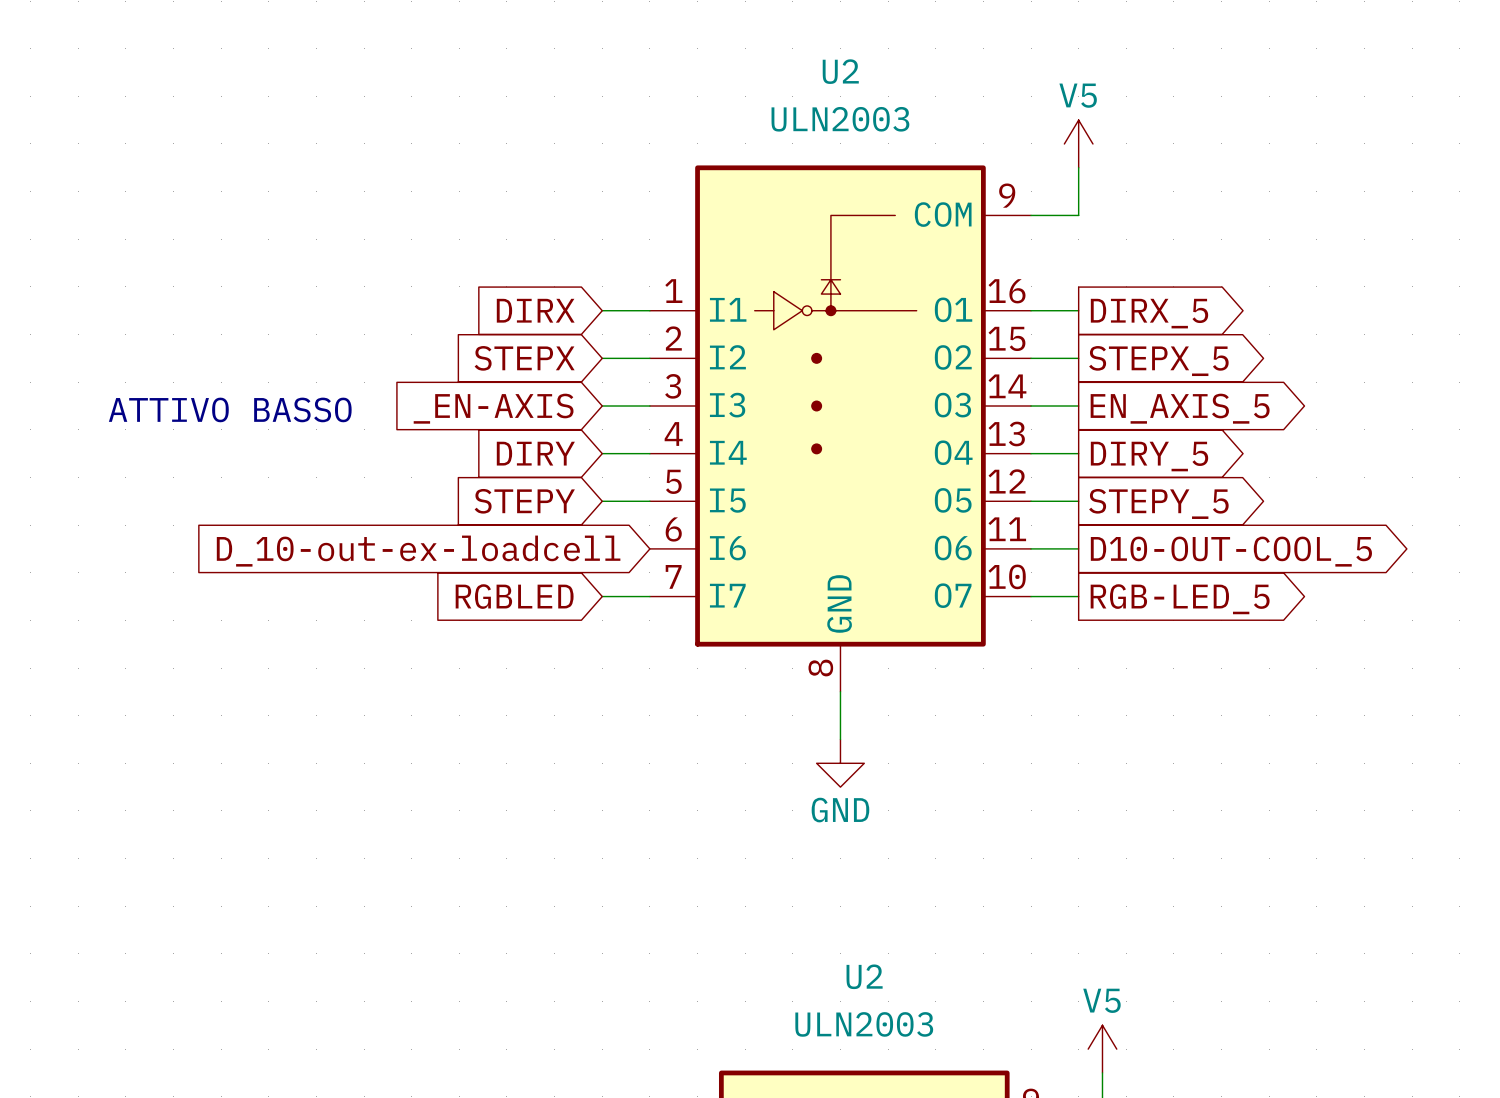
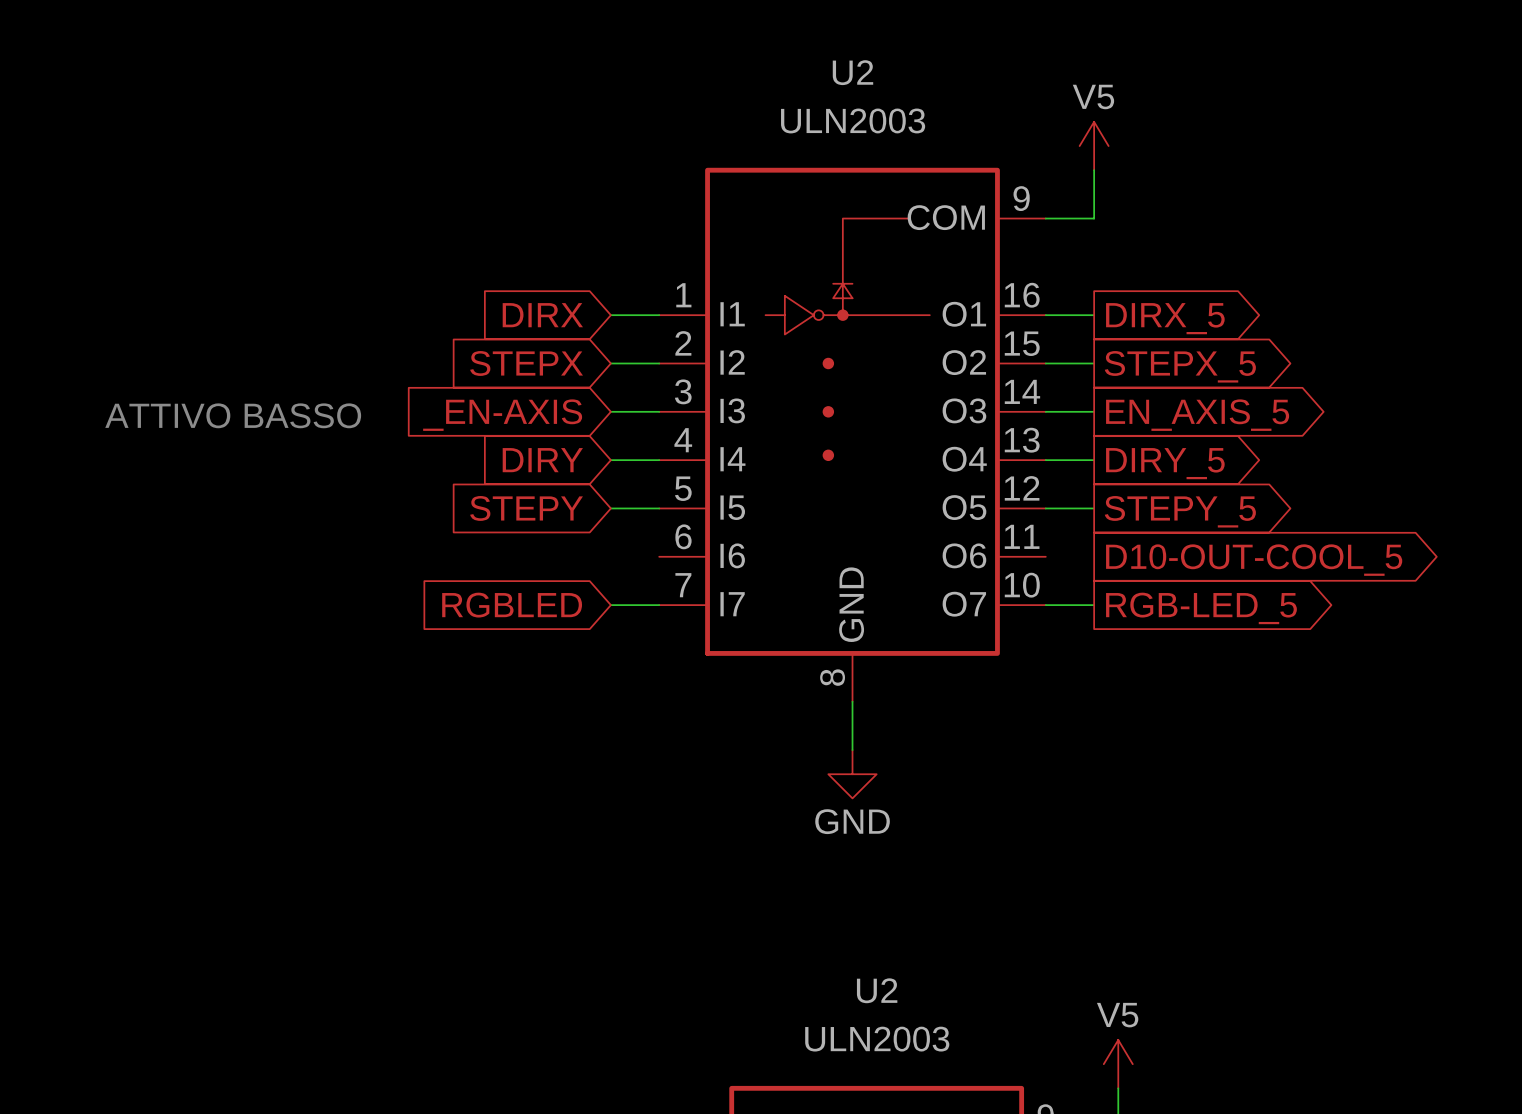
wire: (1031, 548) (1078, 548) -> none
global label: D_10-out-ex-loadcell (418, 551) -> none

